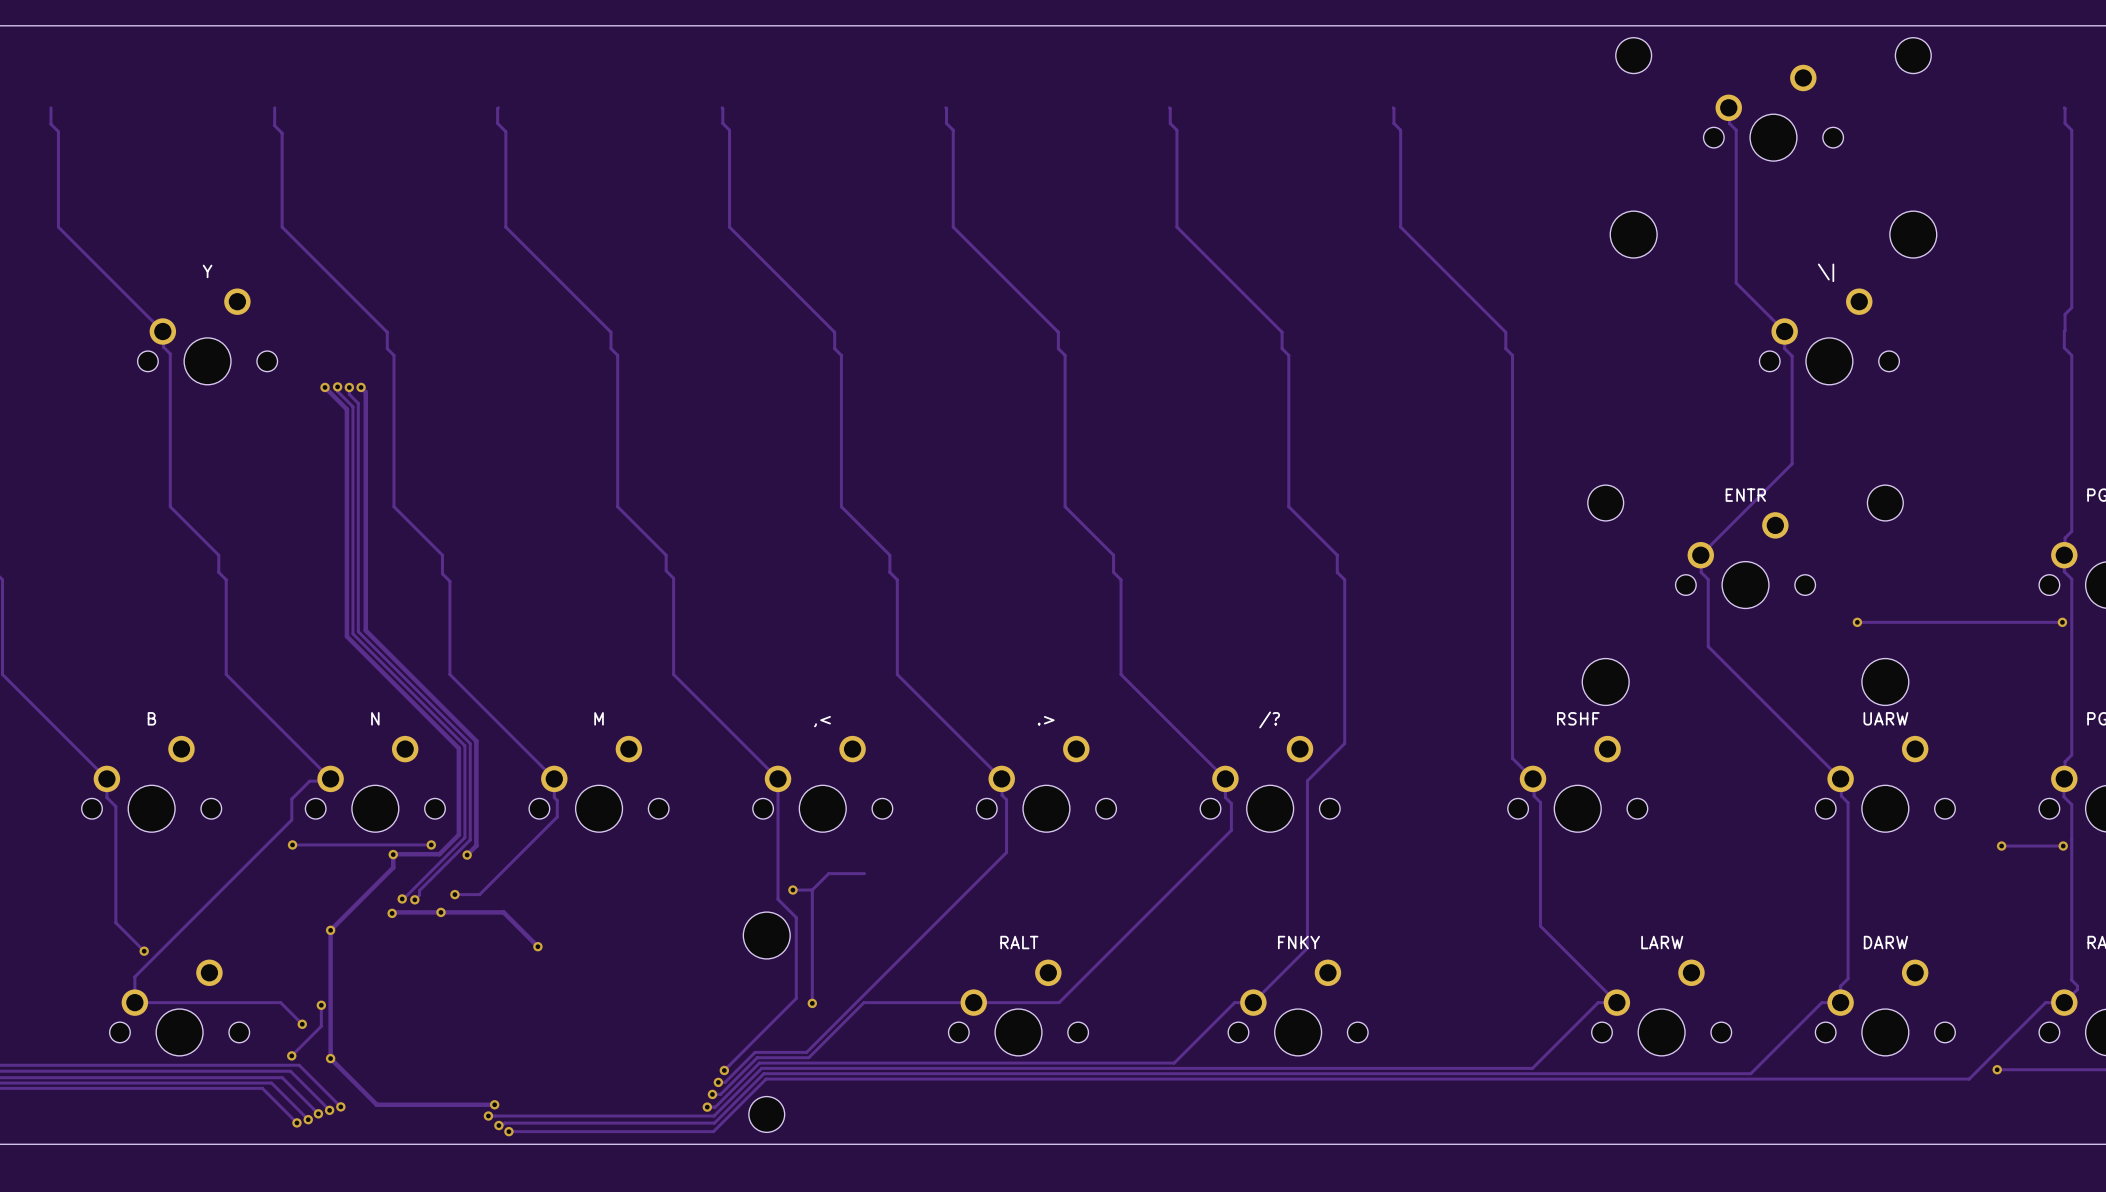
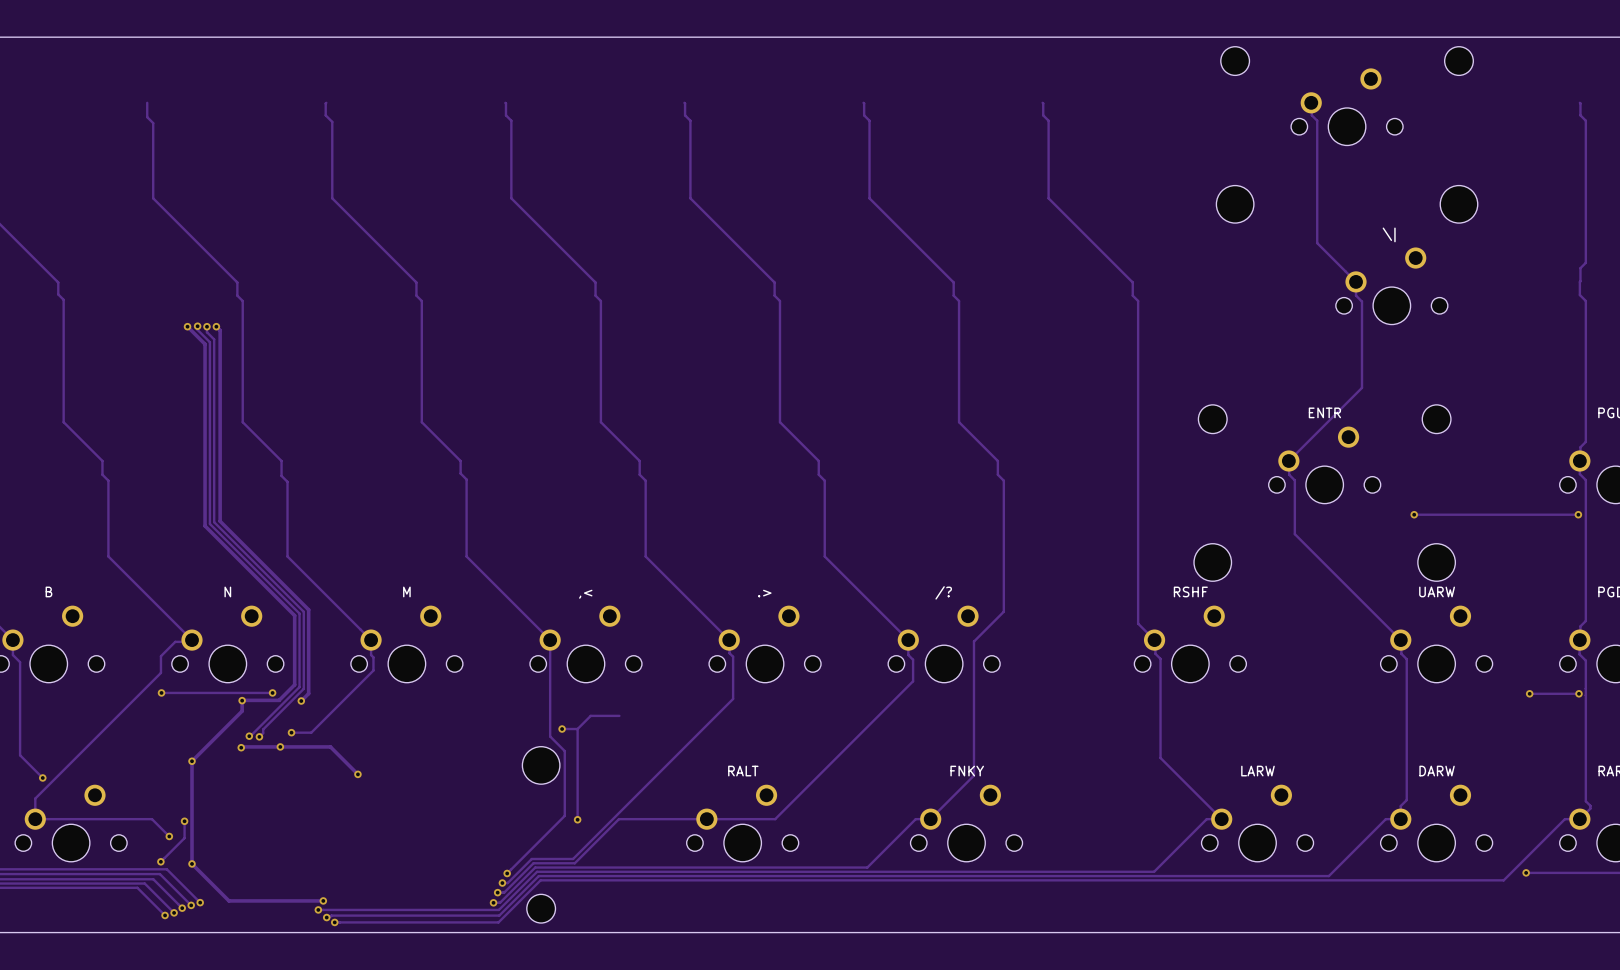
part: Y (207, 336) -> none

